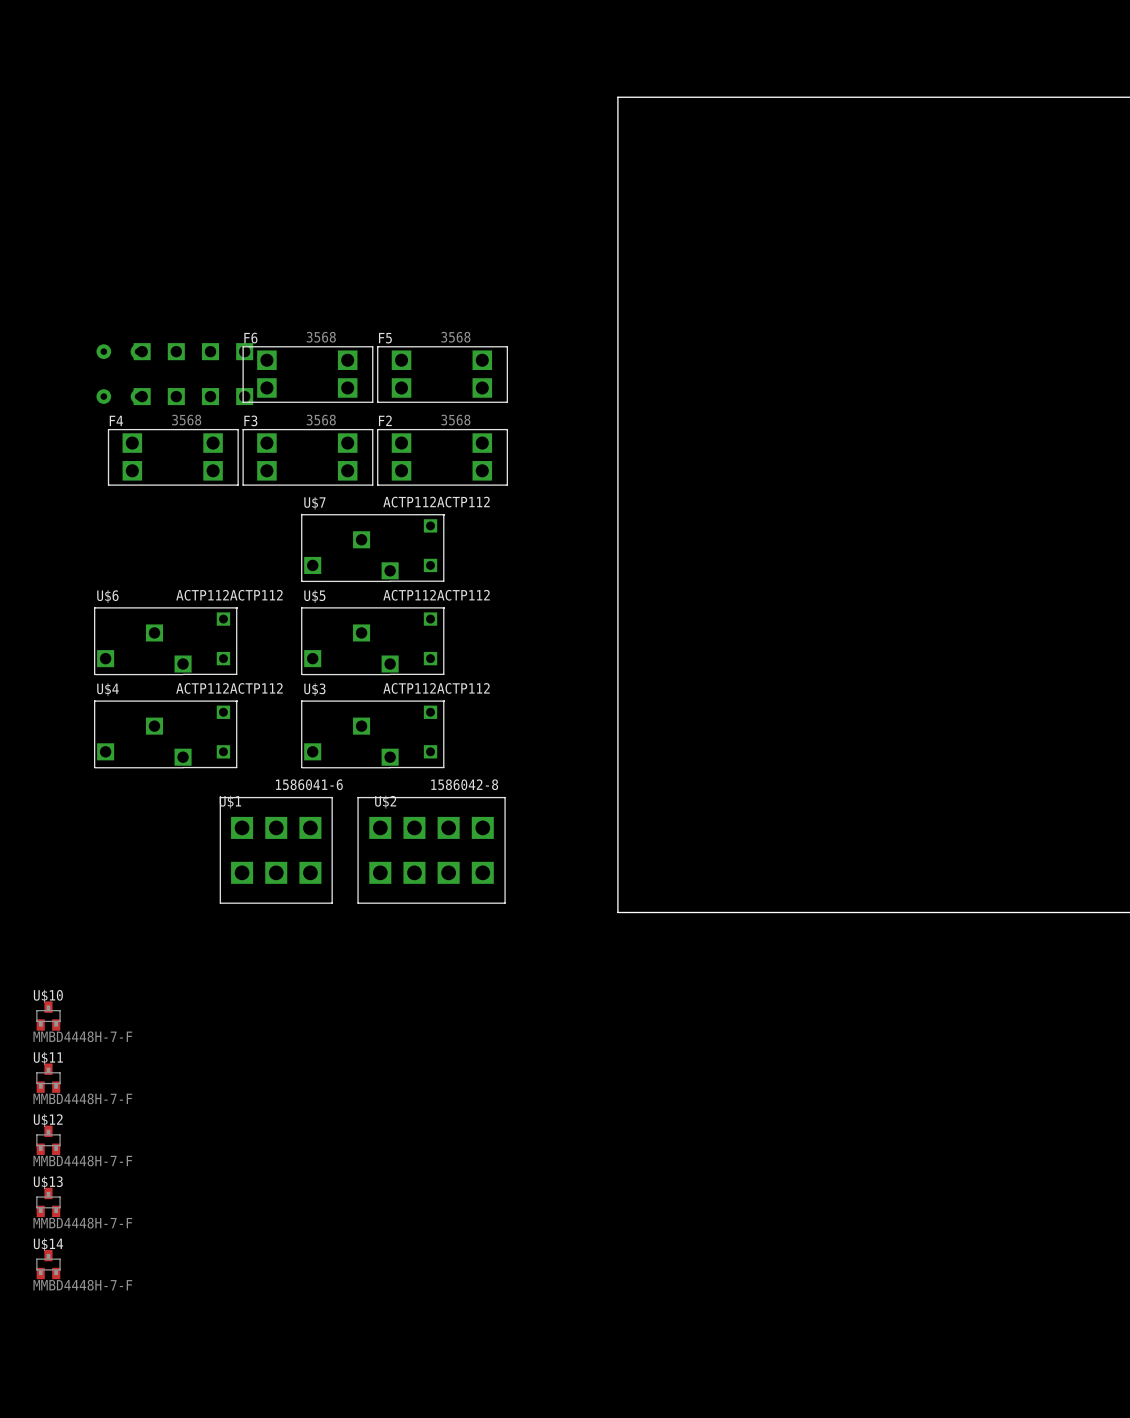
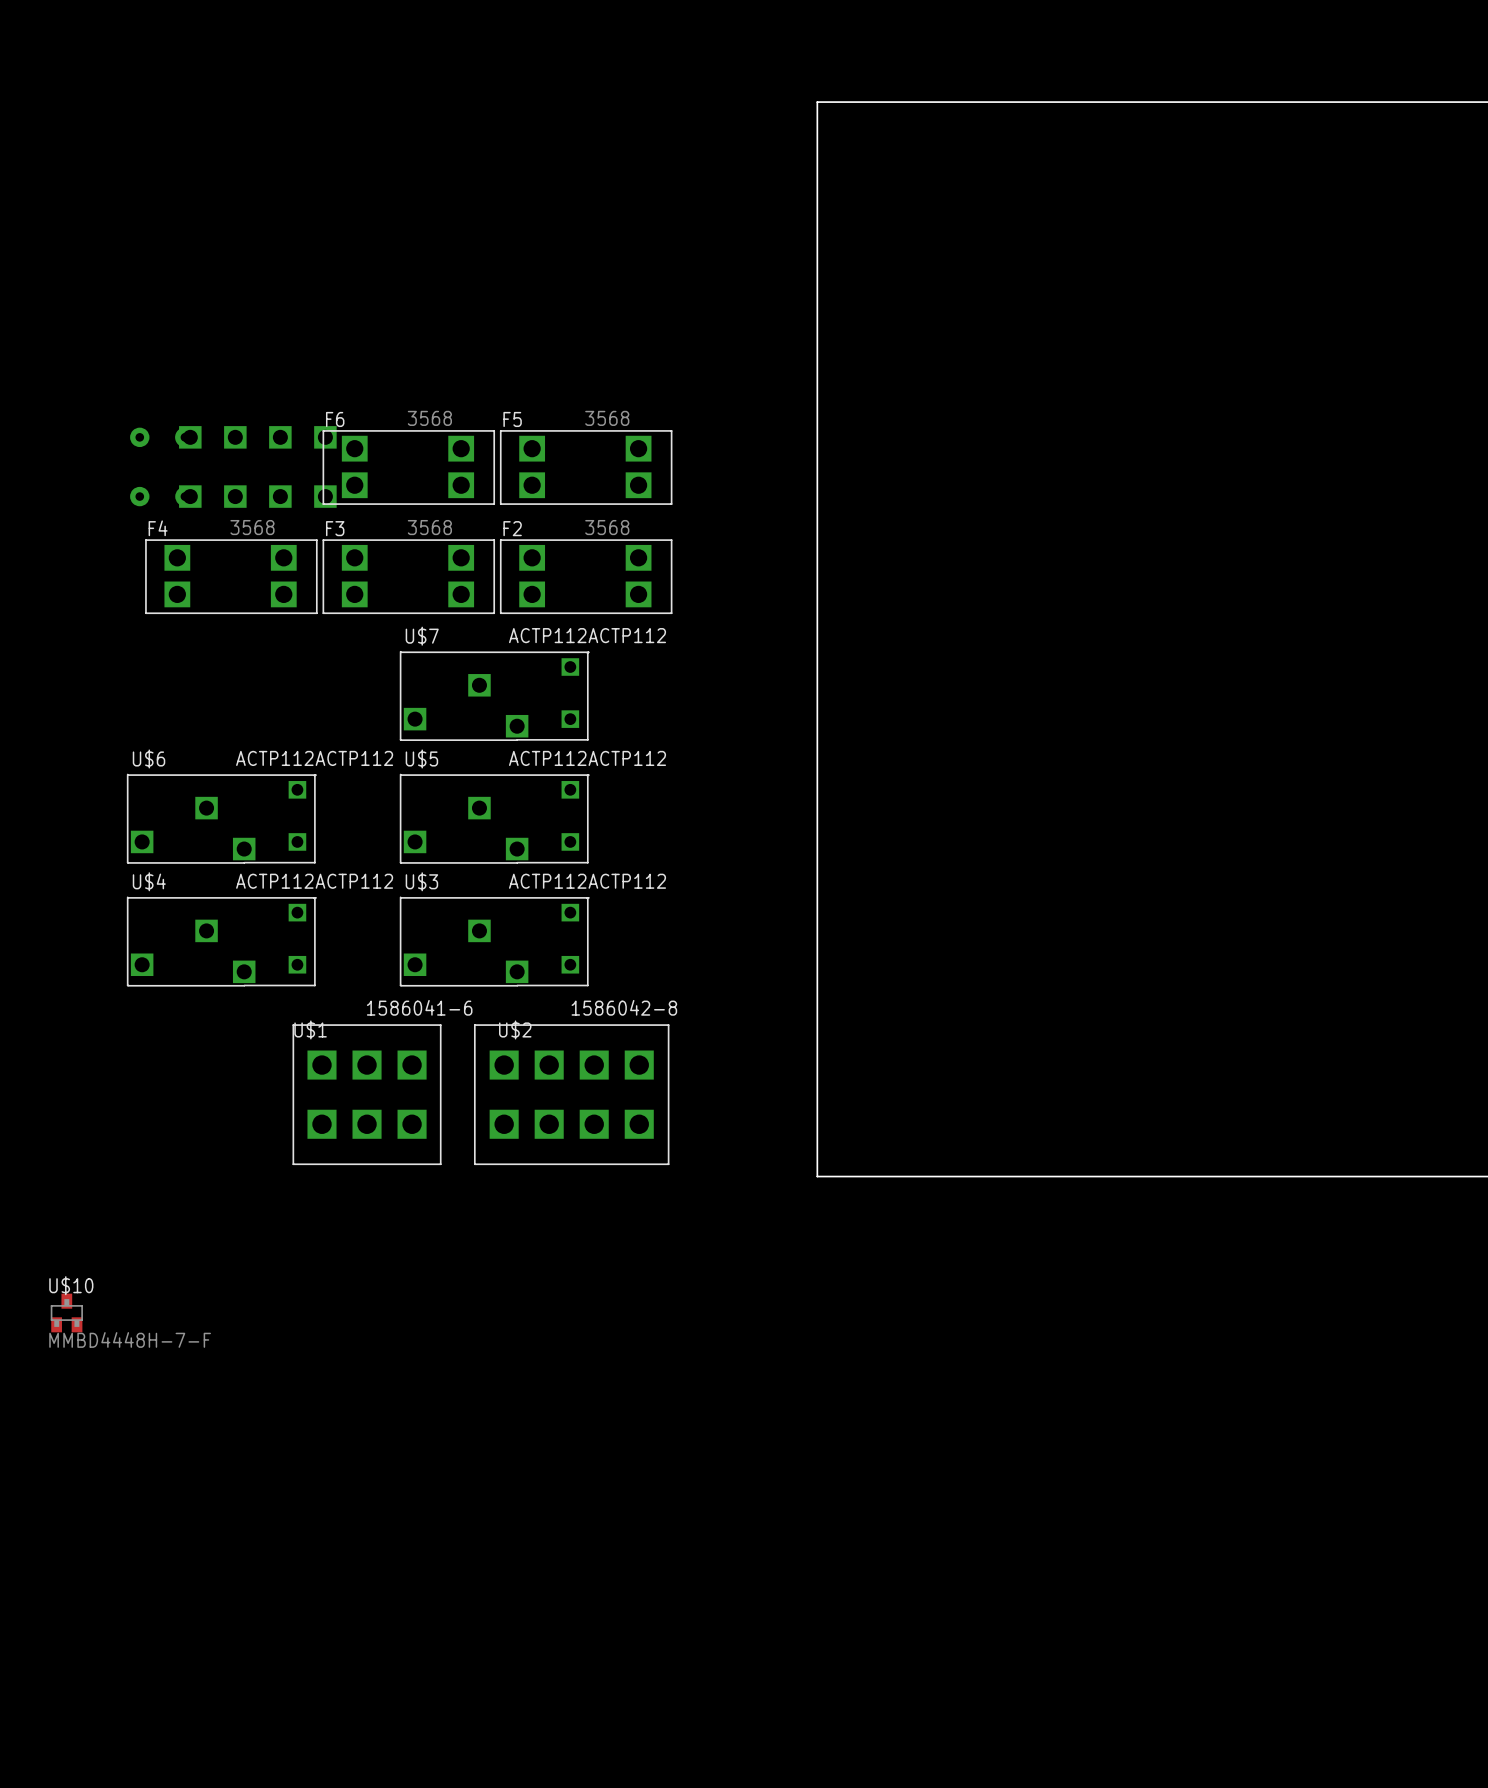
U$11: MMBD4448H-7-F (48, 1078) -> none
U$12: MMBD4448H-7-F (48, 1140) -> none
U$13: MMBD4448H-7-F (48, 1202) -> none
U$14: MMBD4448H-7-F (48, 1264) -> none

